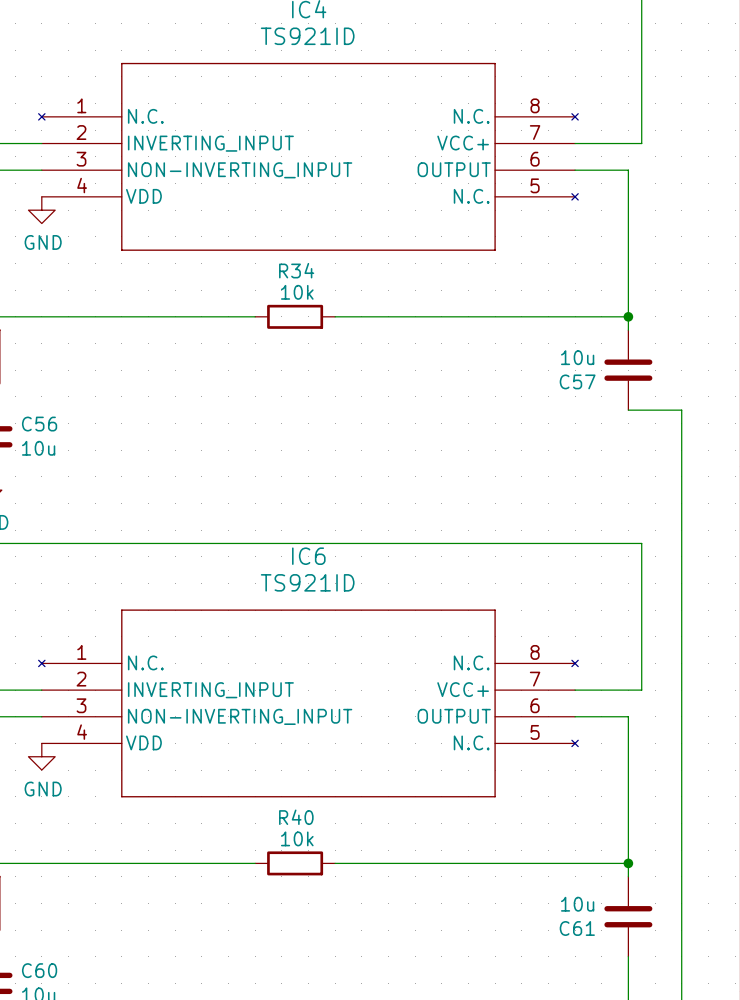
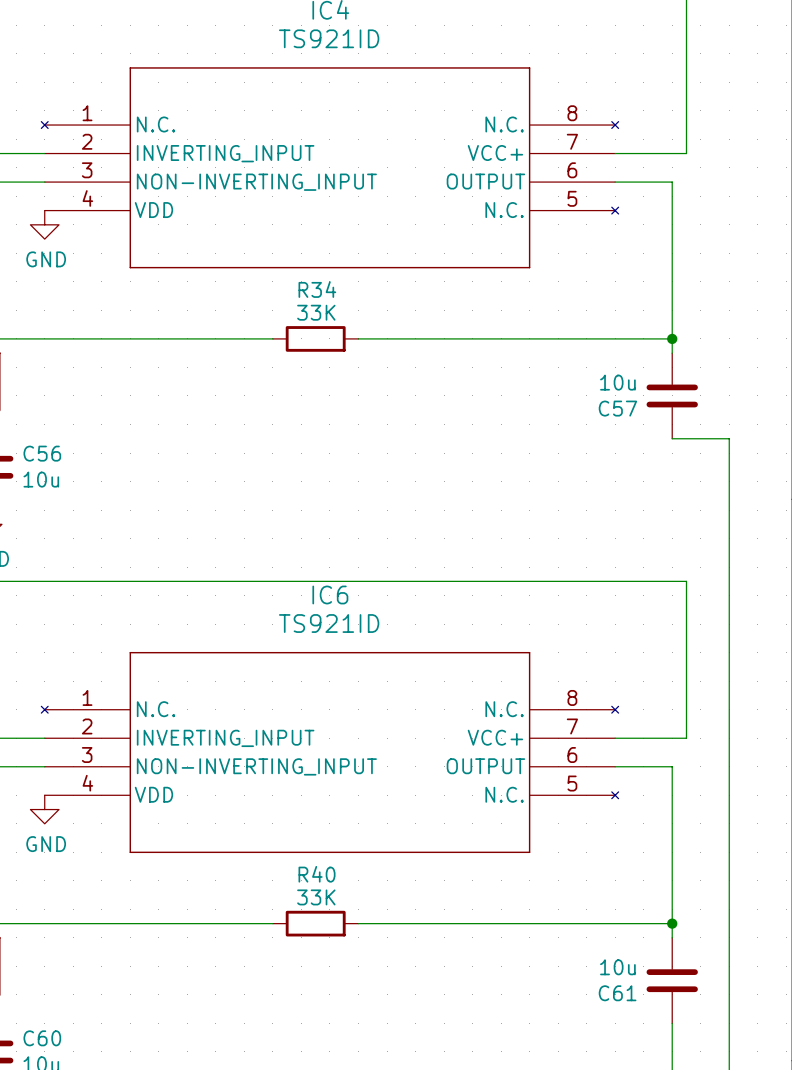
R34 value: 10k (297, 292) -> 33K (316, 312)
R40 value: 10k (297, 838) -> 33K (316, 897)

